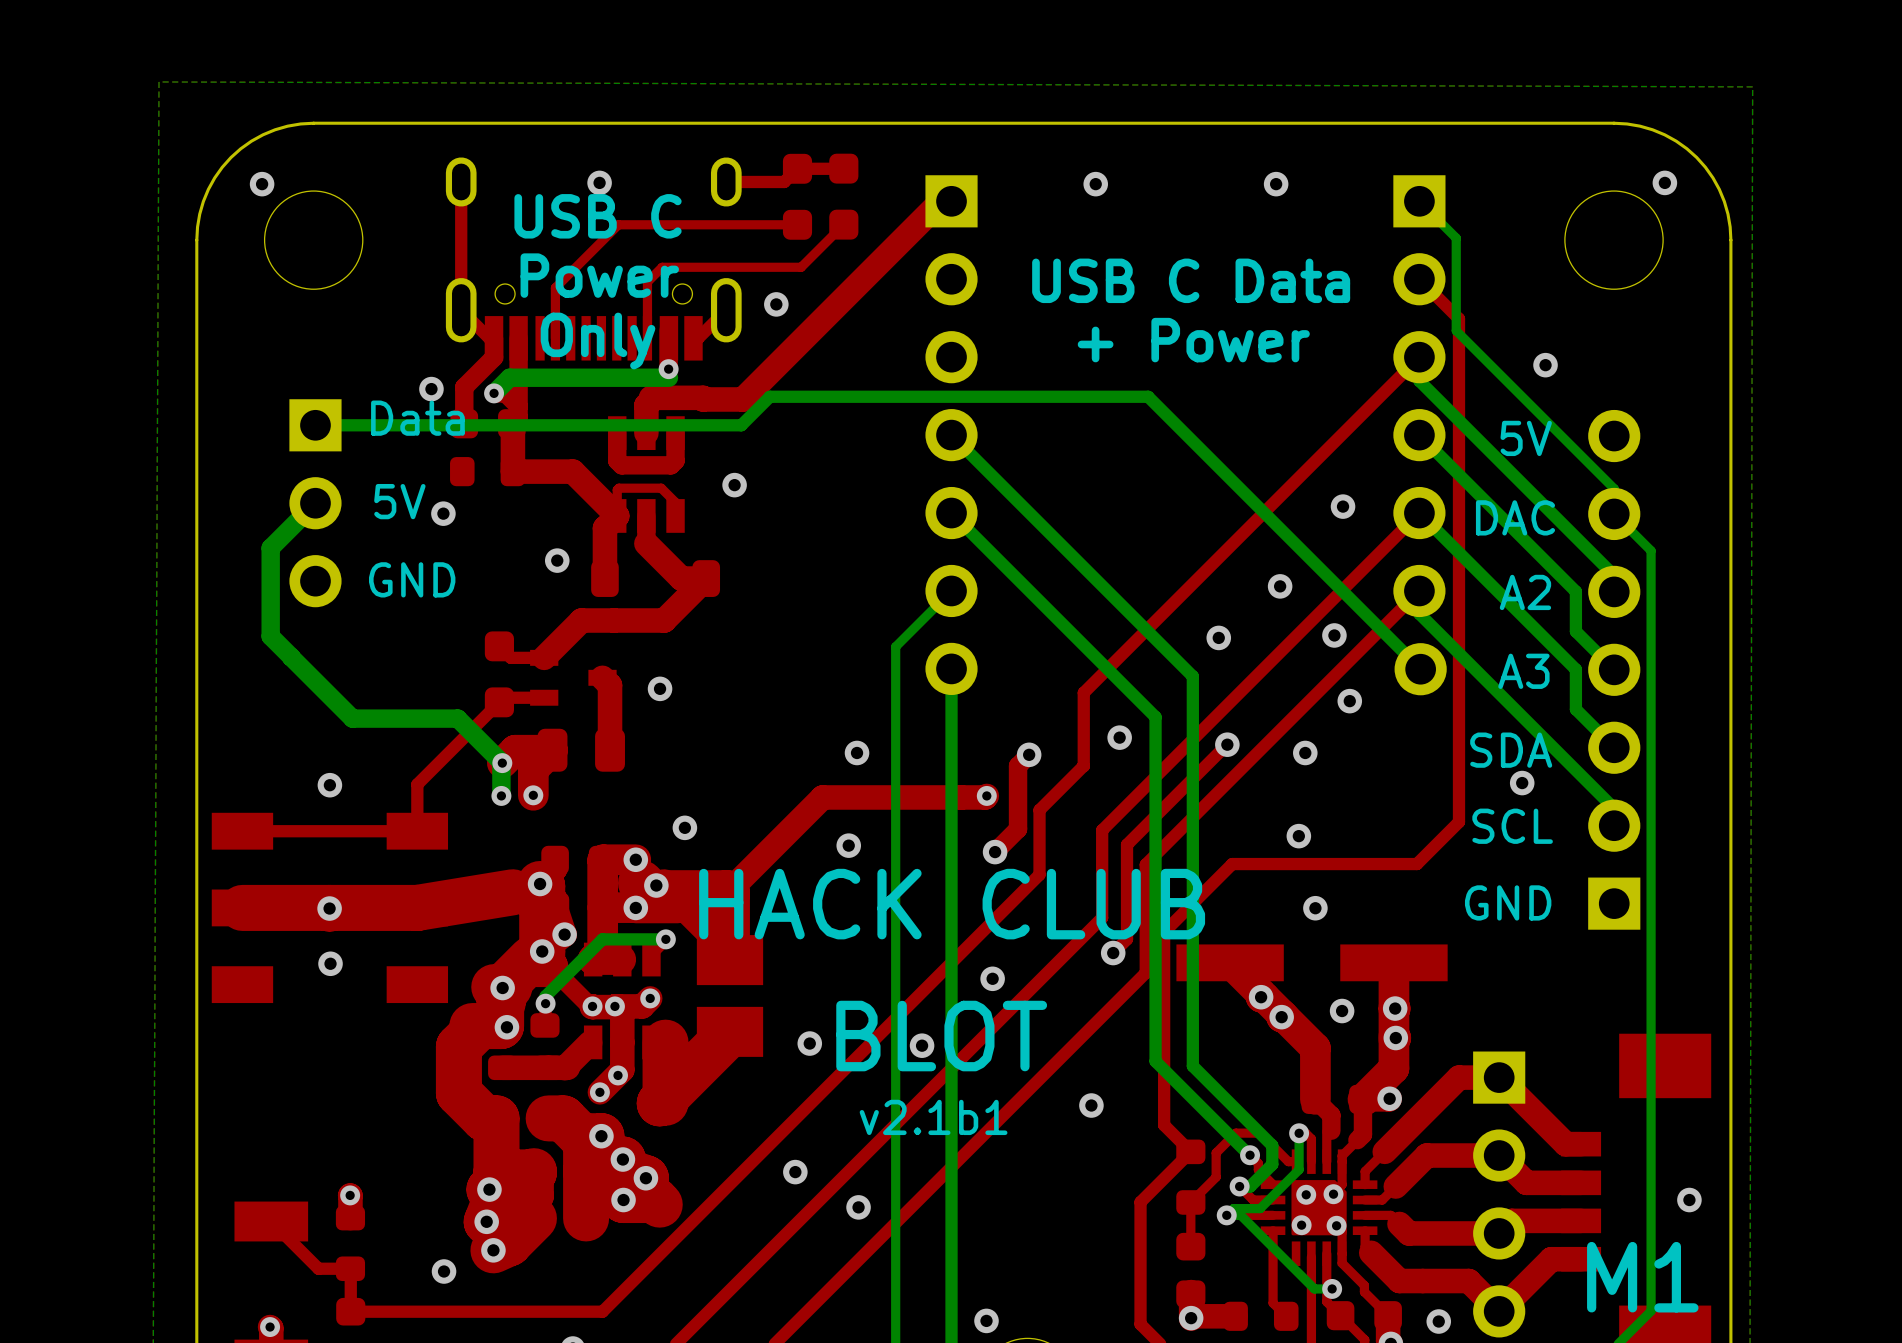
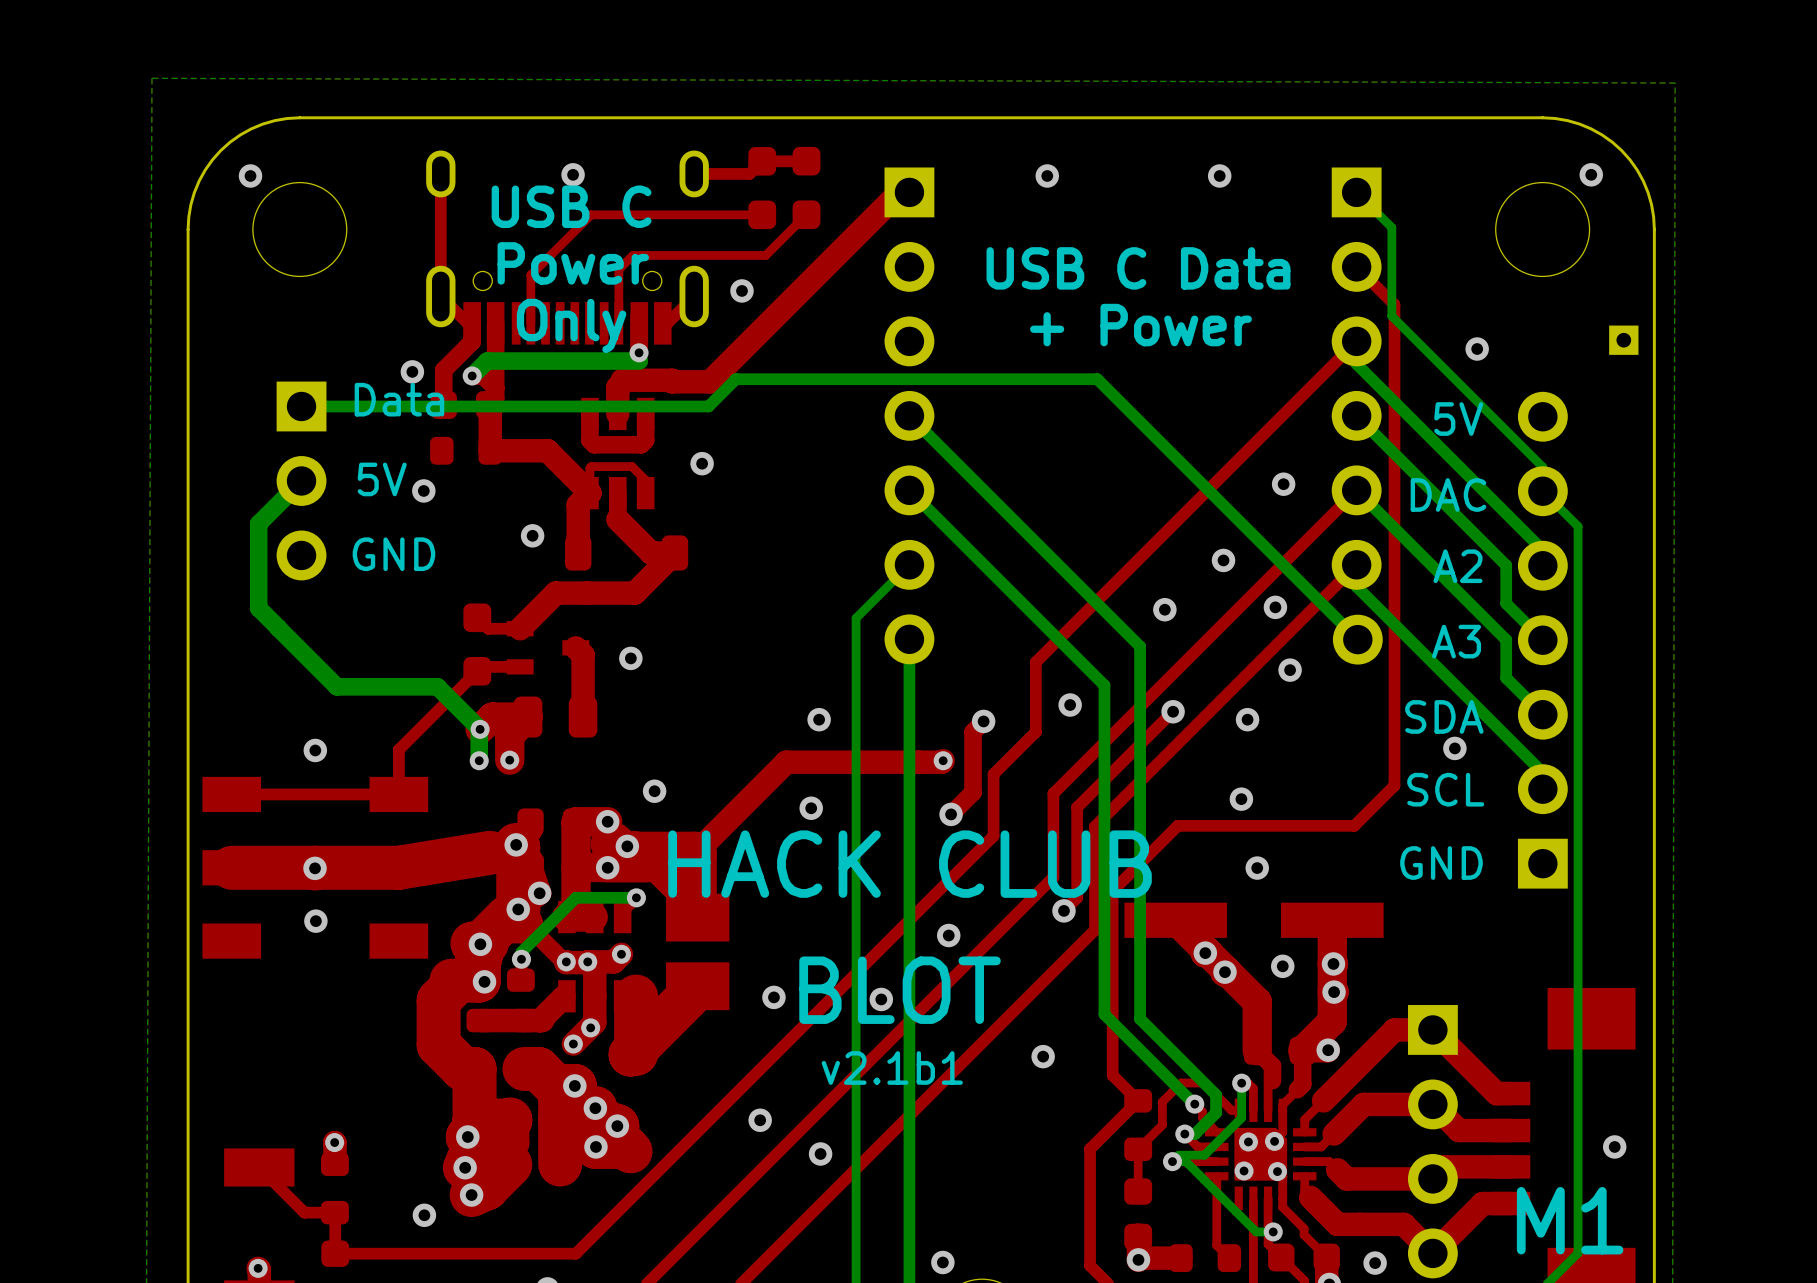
part: none -> (1623, 340)

